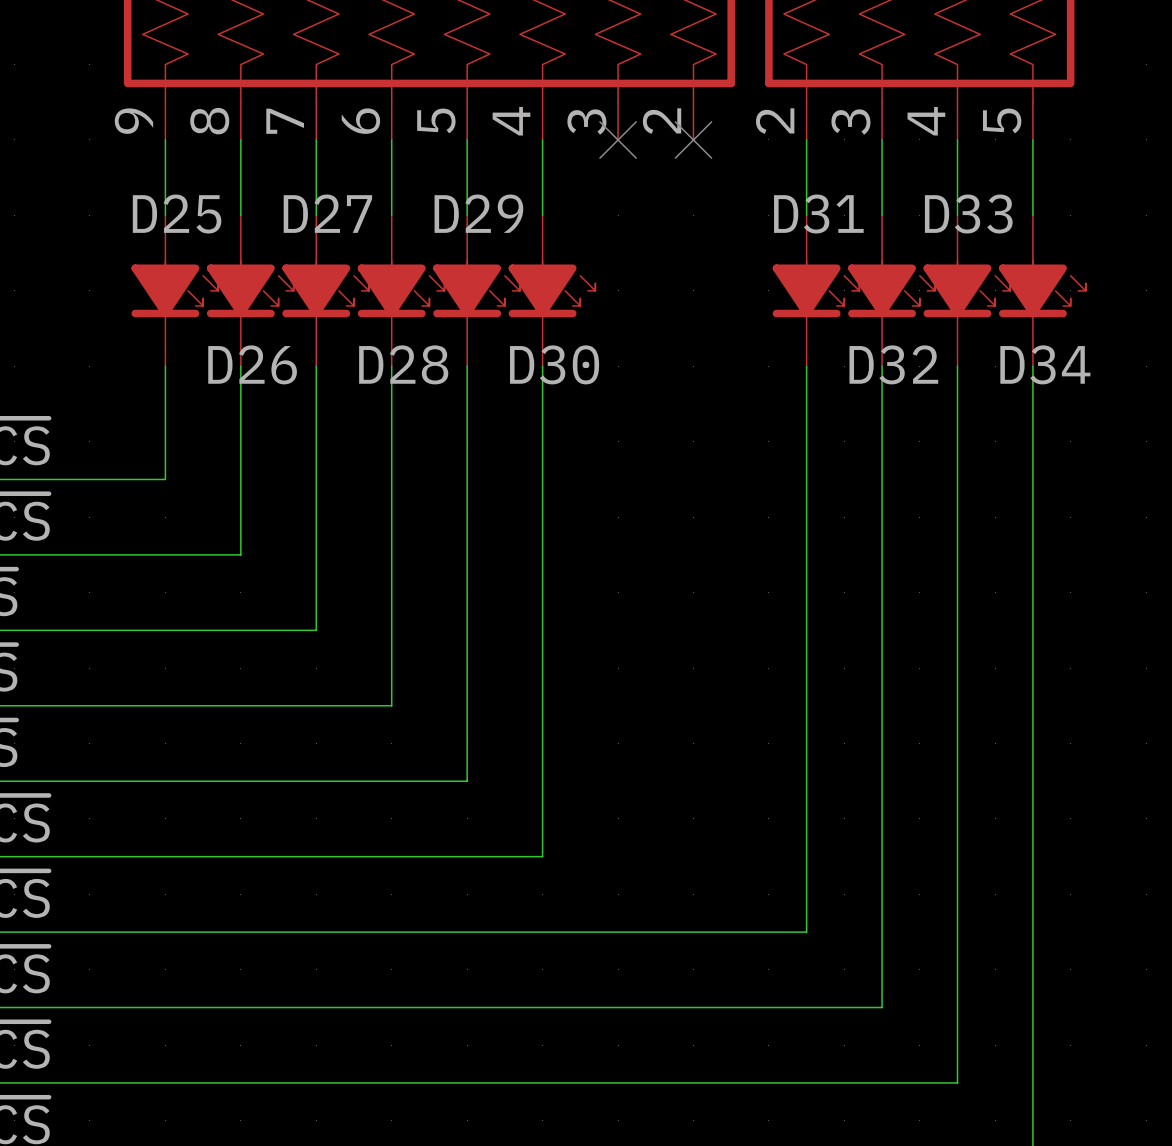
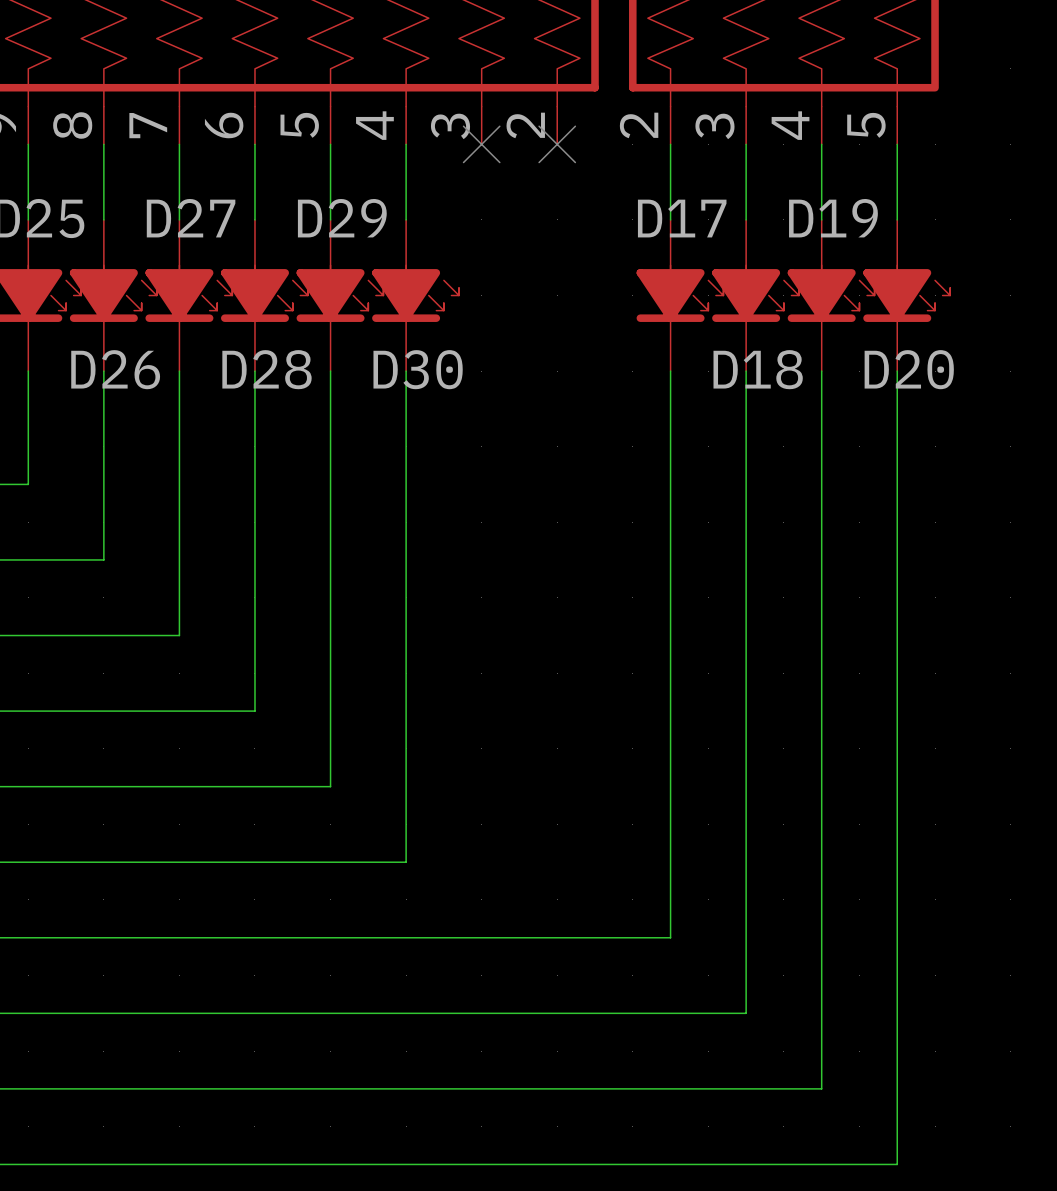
D31 name: D31 (818, 214) -> D17 (682, 218)
D33 name: D33 (968, 214) -> D19 (833, 218)
D32 name: D32 (893, 364) -> D18 (758, 369)
D34 name: D34 (1045, 364) -> D20 (909, 369)

